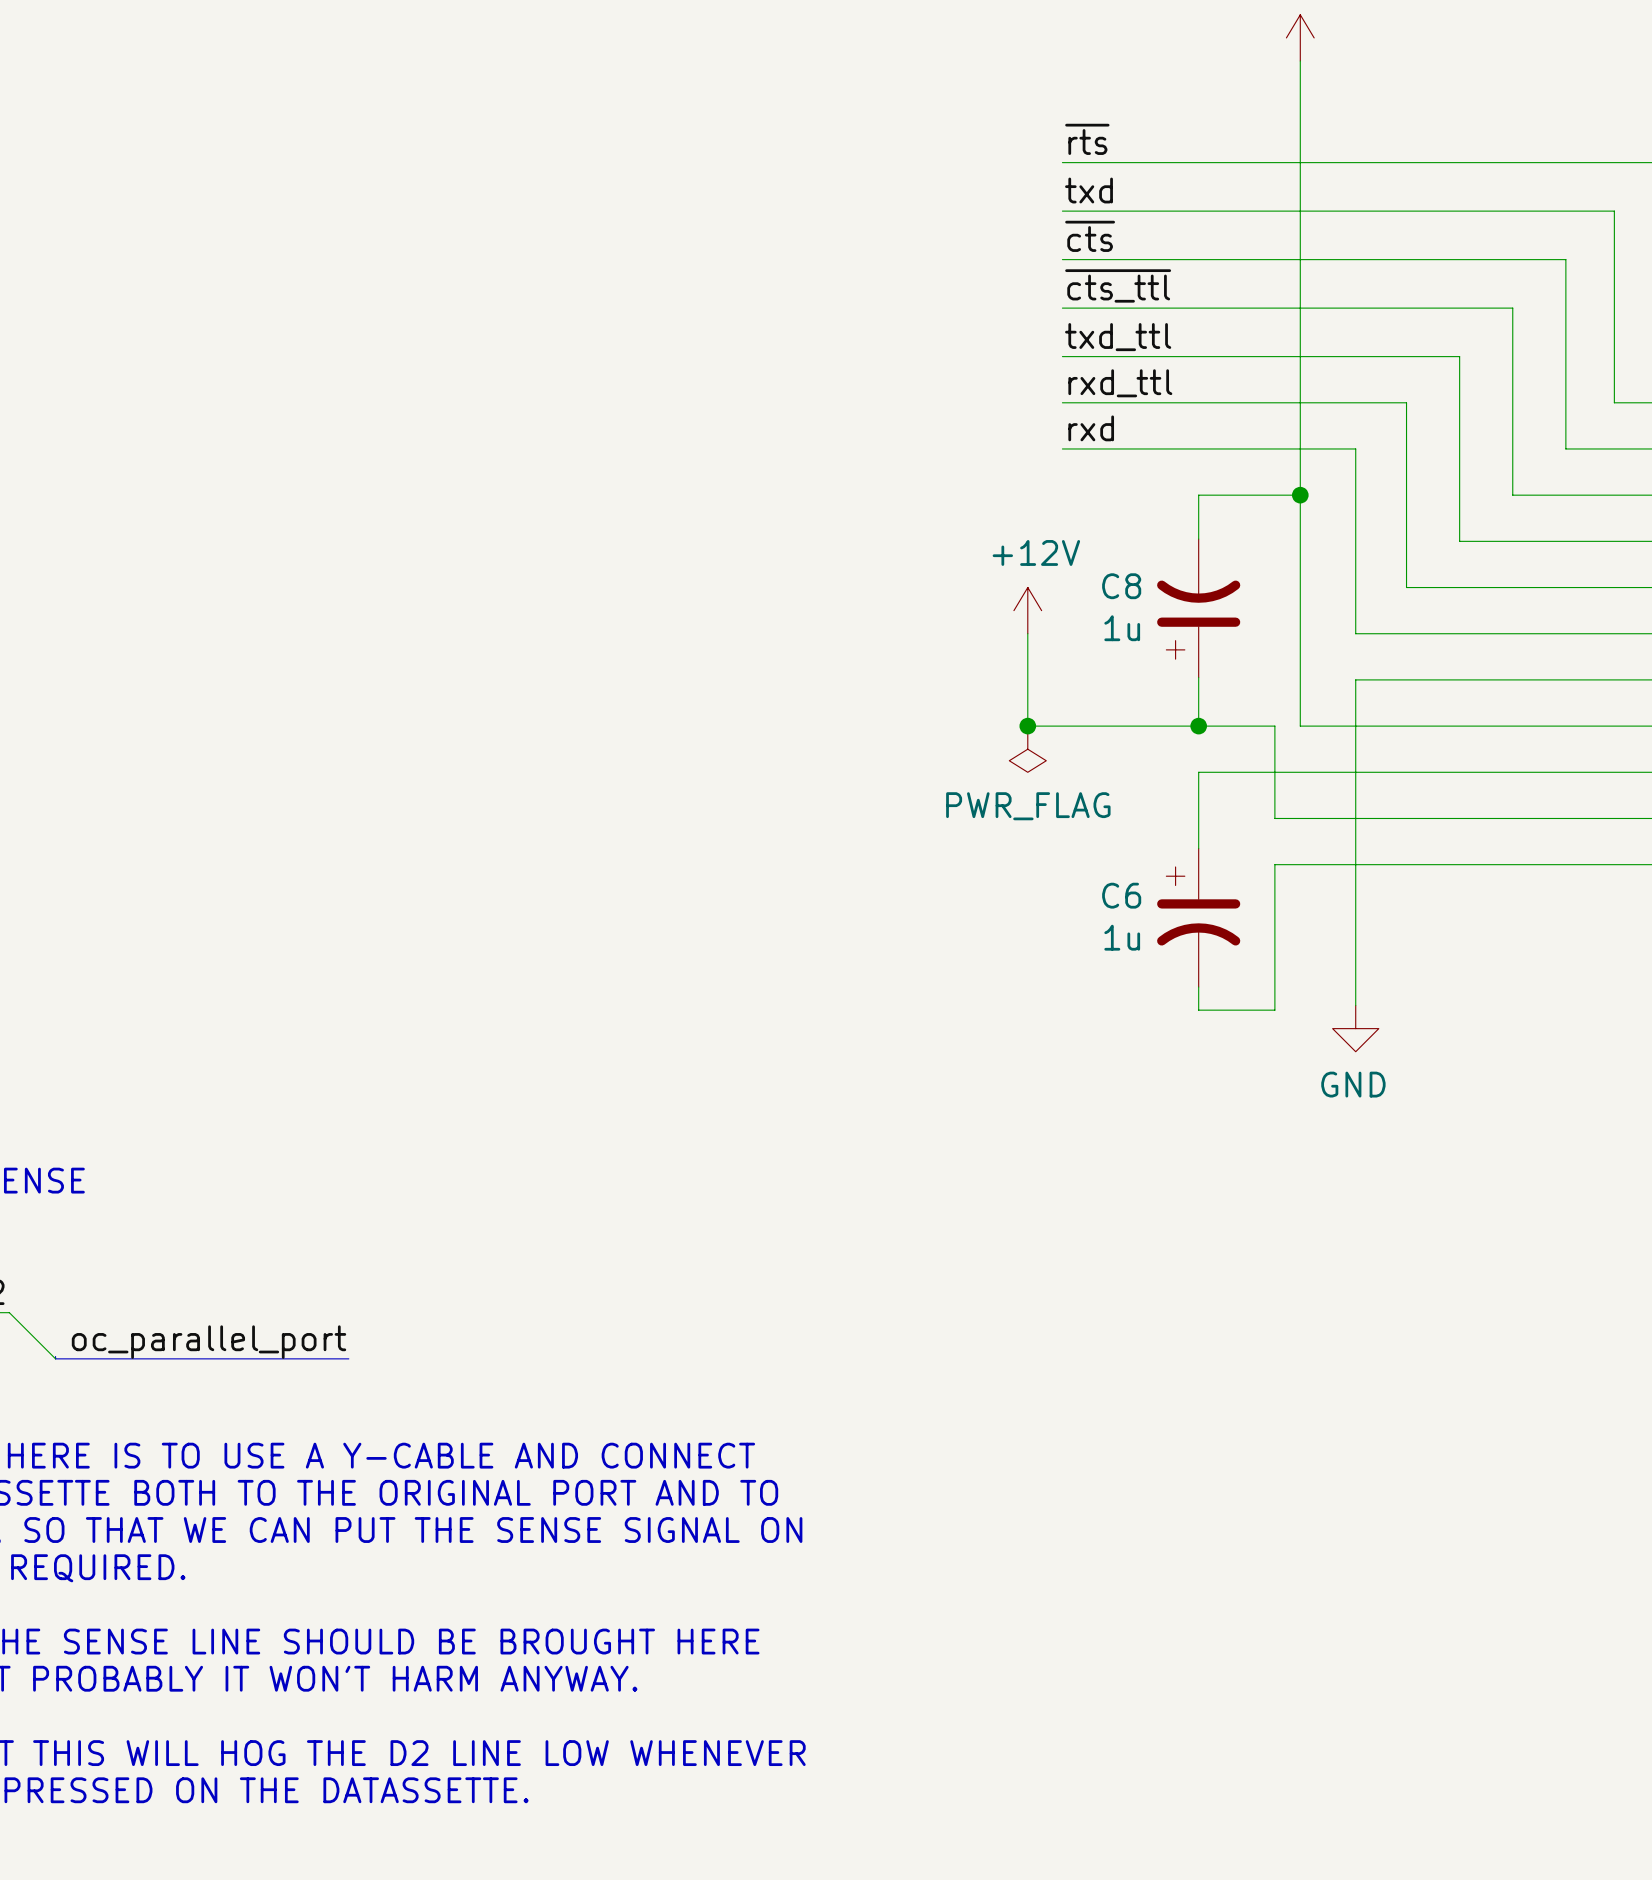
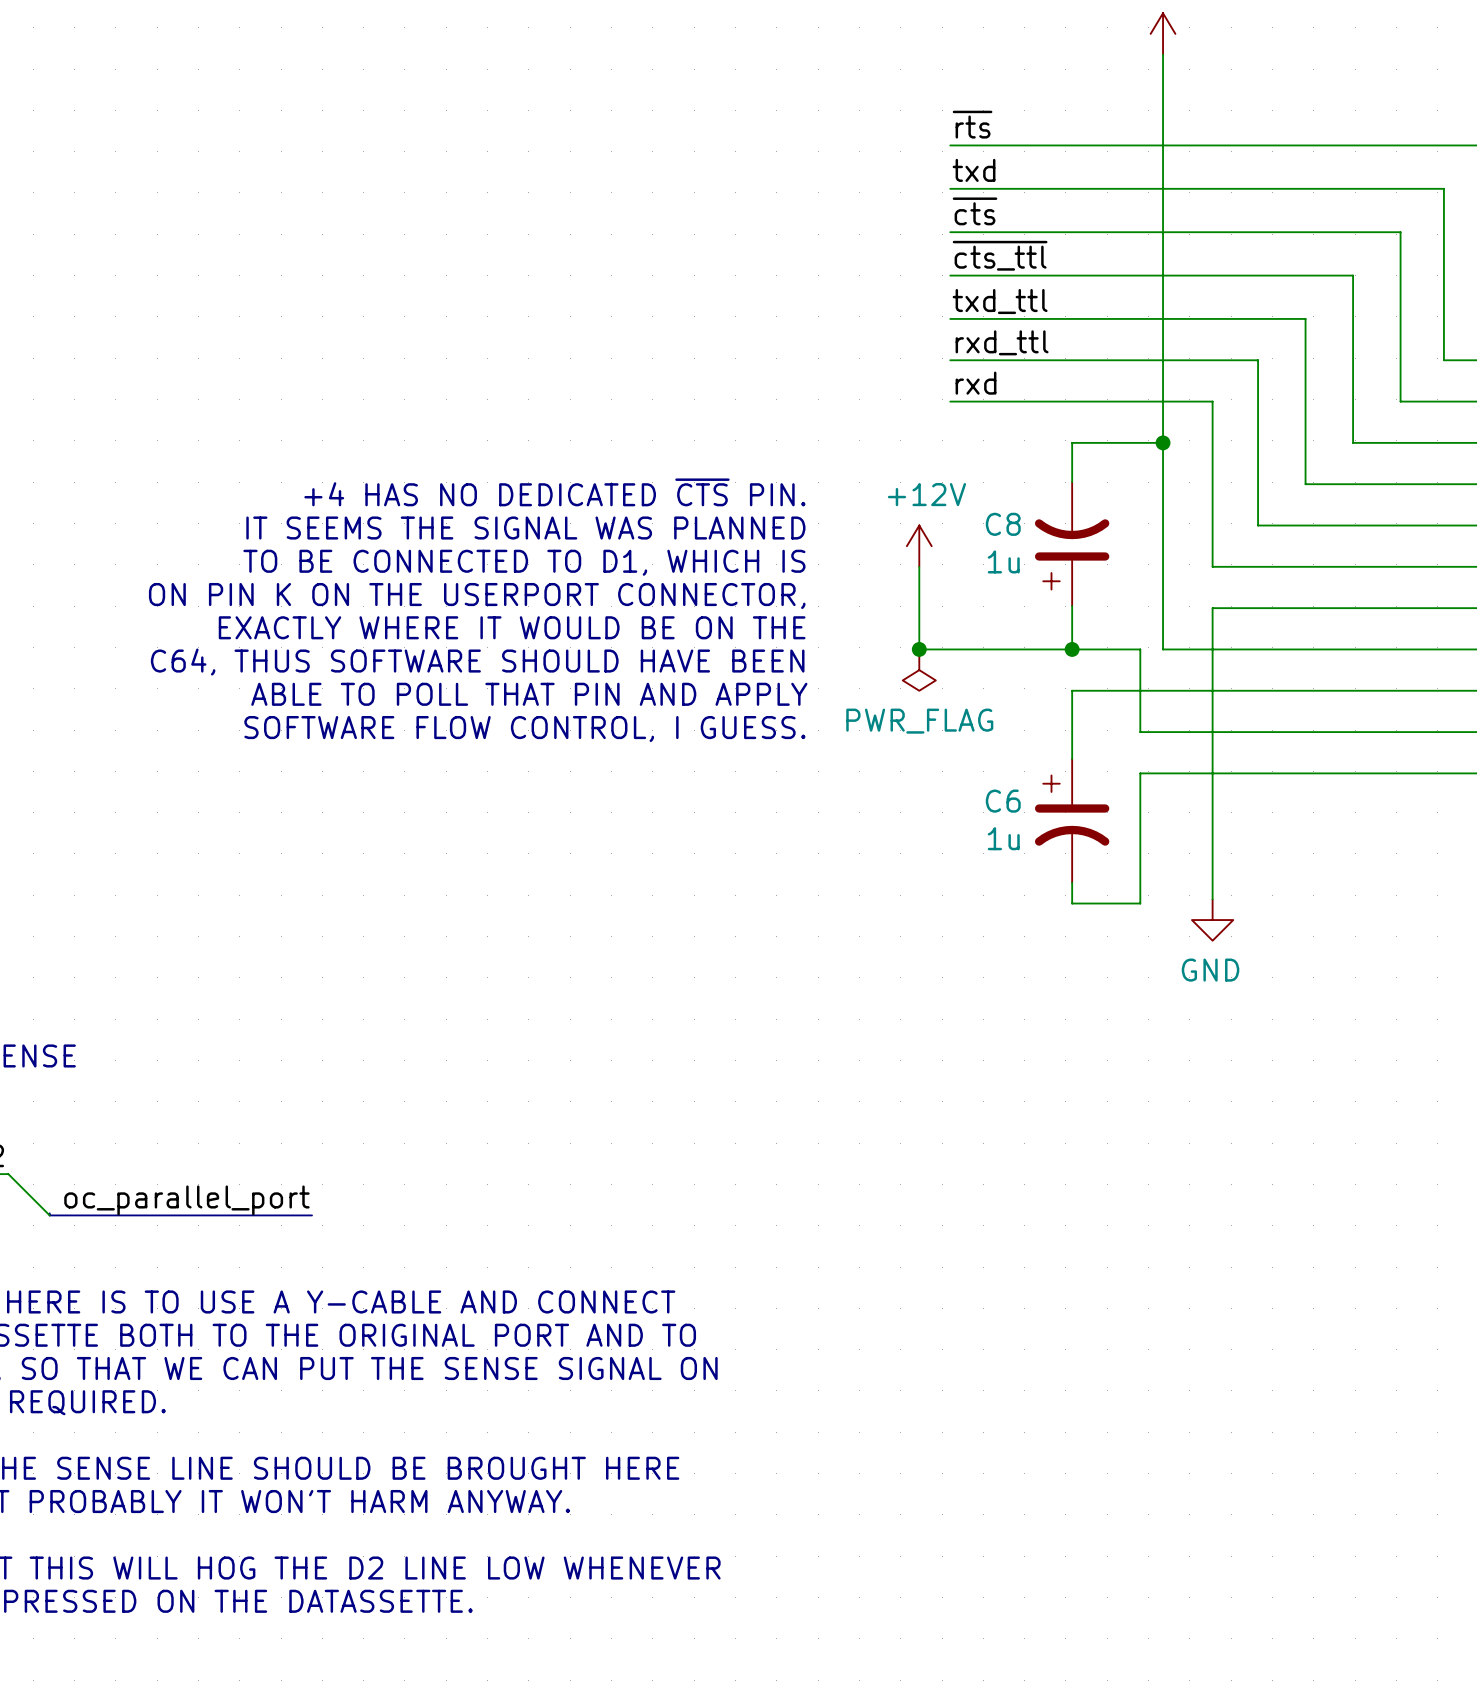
text: none -> +4 HAS NO DEDICATED ~{CTS} PIN. (554, 492)
text: none -> IT SEEMS THE SIGNAL WAS PLANNED (525, 528)
text: none -> TO BE CONNECTED TO D1, WHICH IS (524, 562)
text: none -> ON PIN K ON THE USERPORT CONNECTOR, (477, 596)
text: none -> EXACTLY WHERE IT WOULD BE ON THE (512, 627)
text: none -> C64, THUS SOFTWARE SHOULD HAVE BEEN (477, 662)
text: none -> ABLE TO POLL THAT PIN AND APPLY (529, 694)
text: none -> SOFTWARE FLOW CONTROL, I GUESS. (524, 729)

